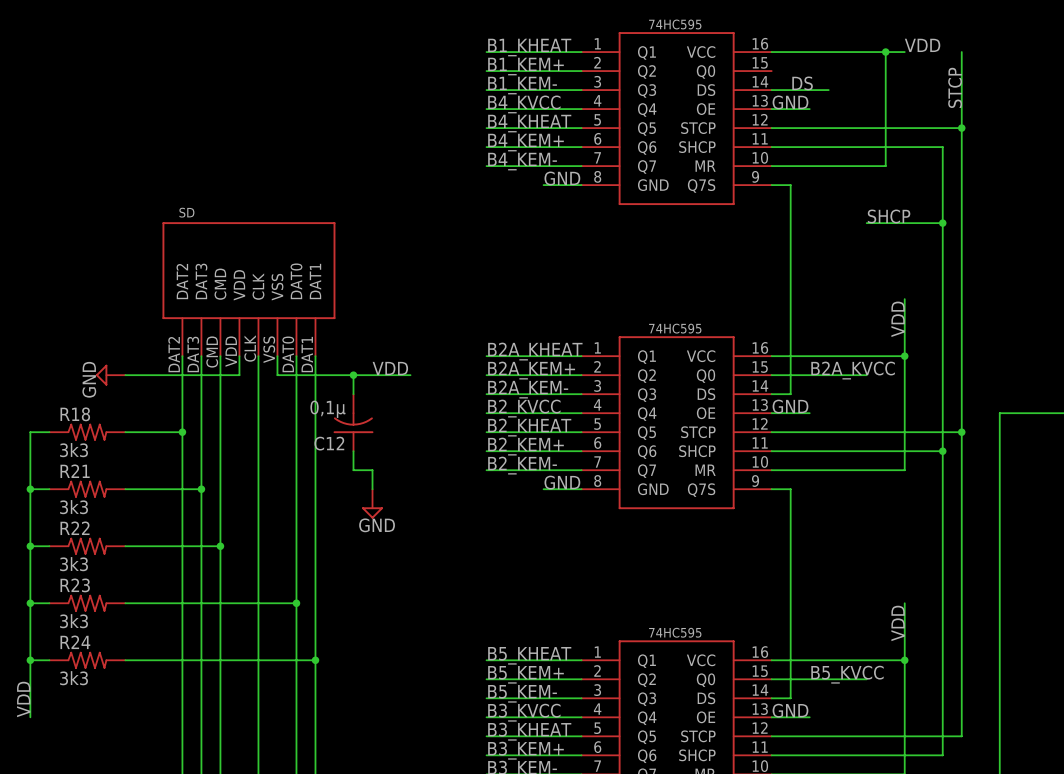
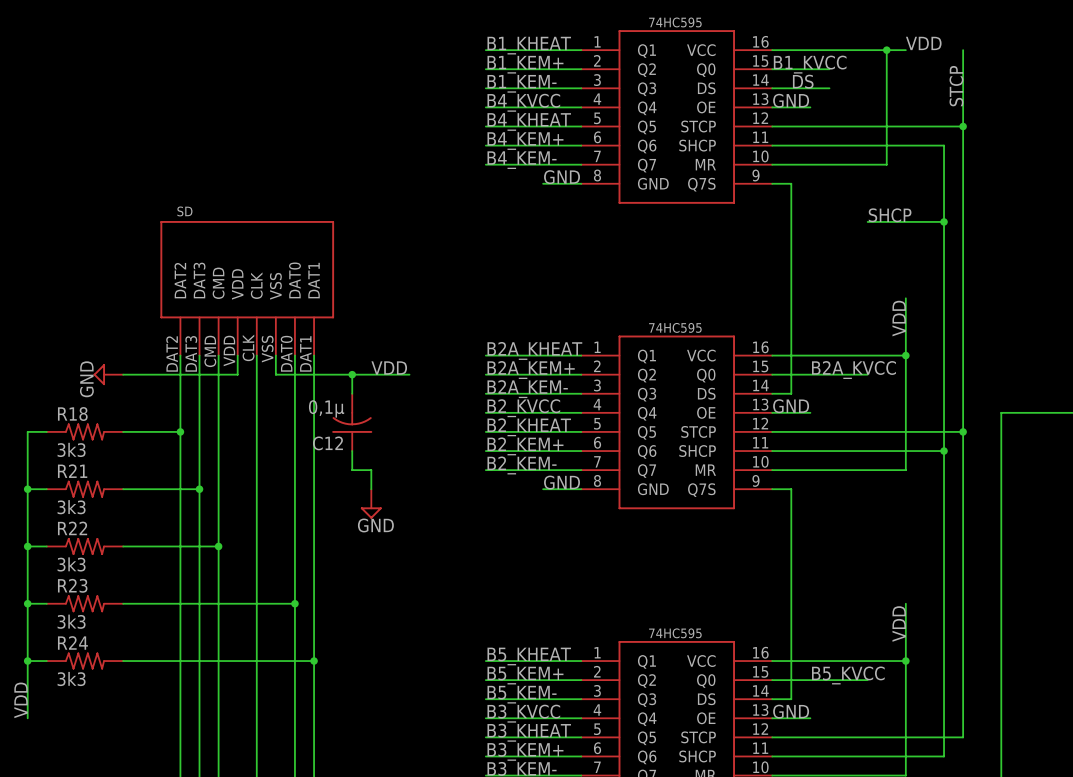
label: none -> B1_KVCC (810, 64)
wire: none -> (772, 69) (829, 69)

